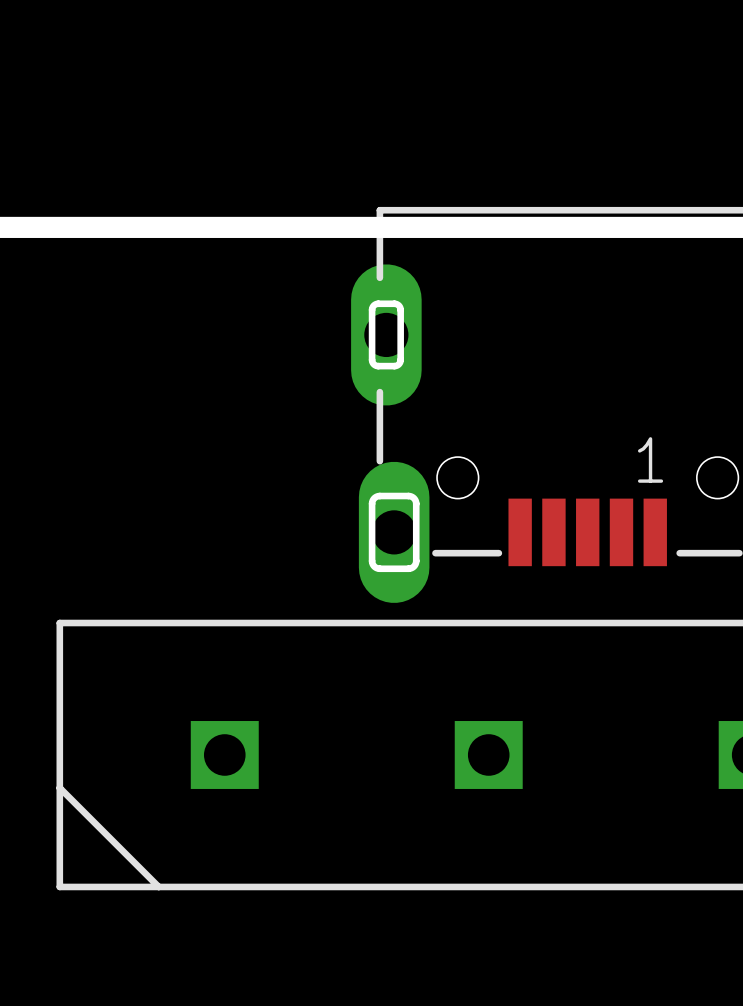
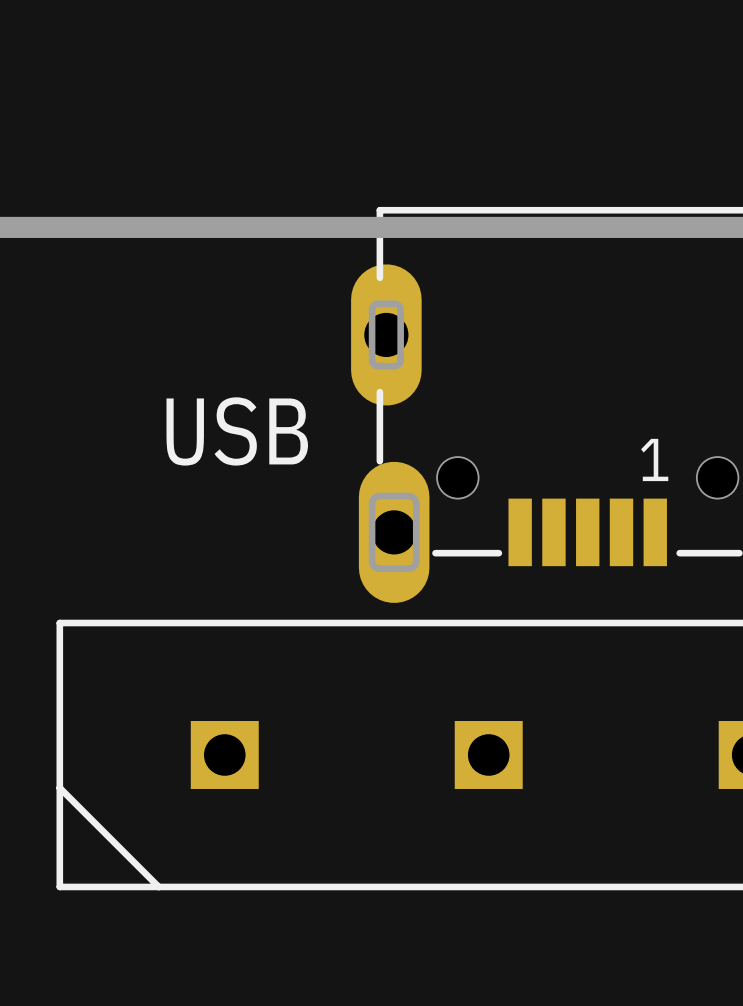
USB name: none -> USB (237, 431)

